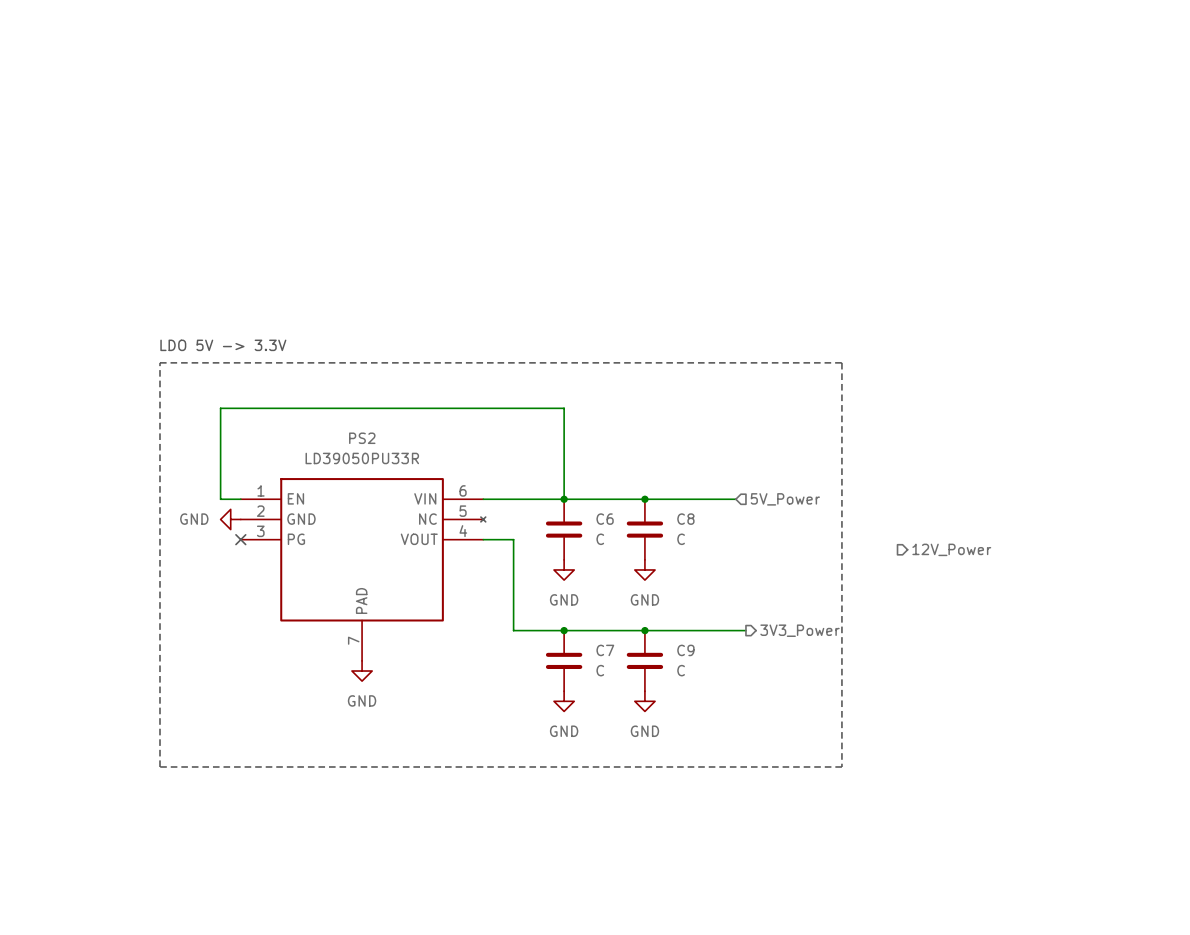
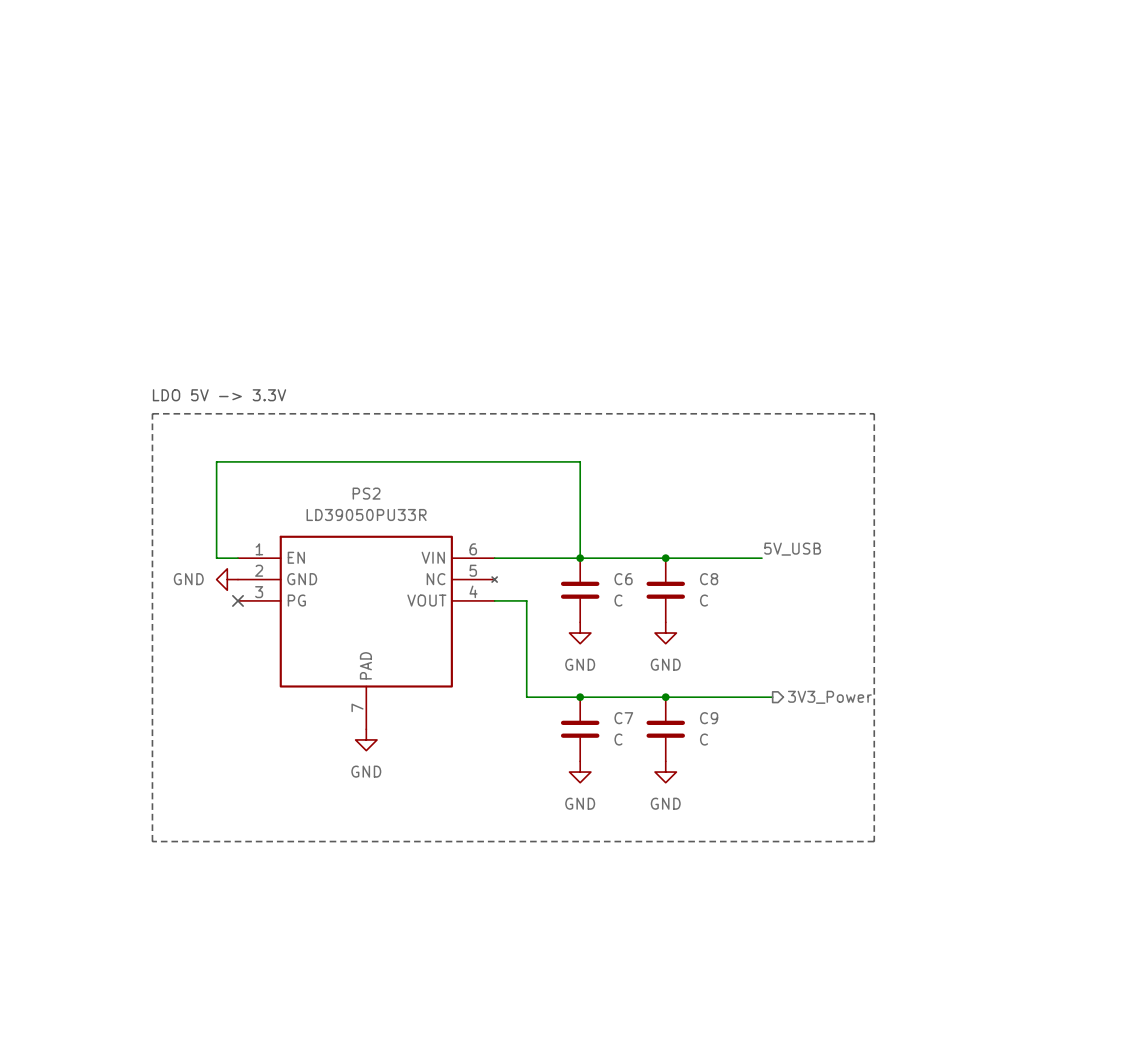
label: none -> 5V_USB (792, 549)
hierarchical label: 5V_Power (785, 499) -> none
hierarchical label: 12V_Power (951, 549) -> none

